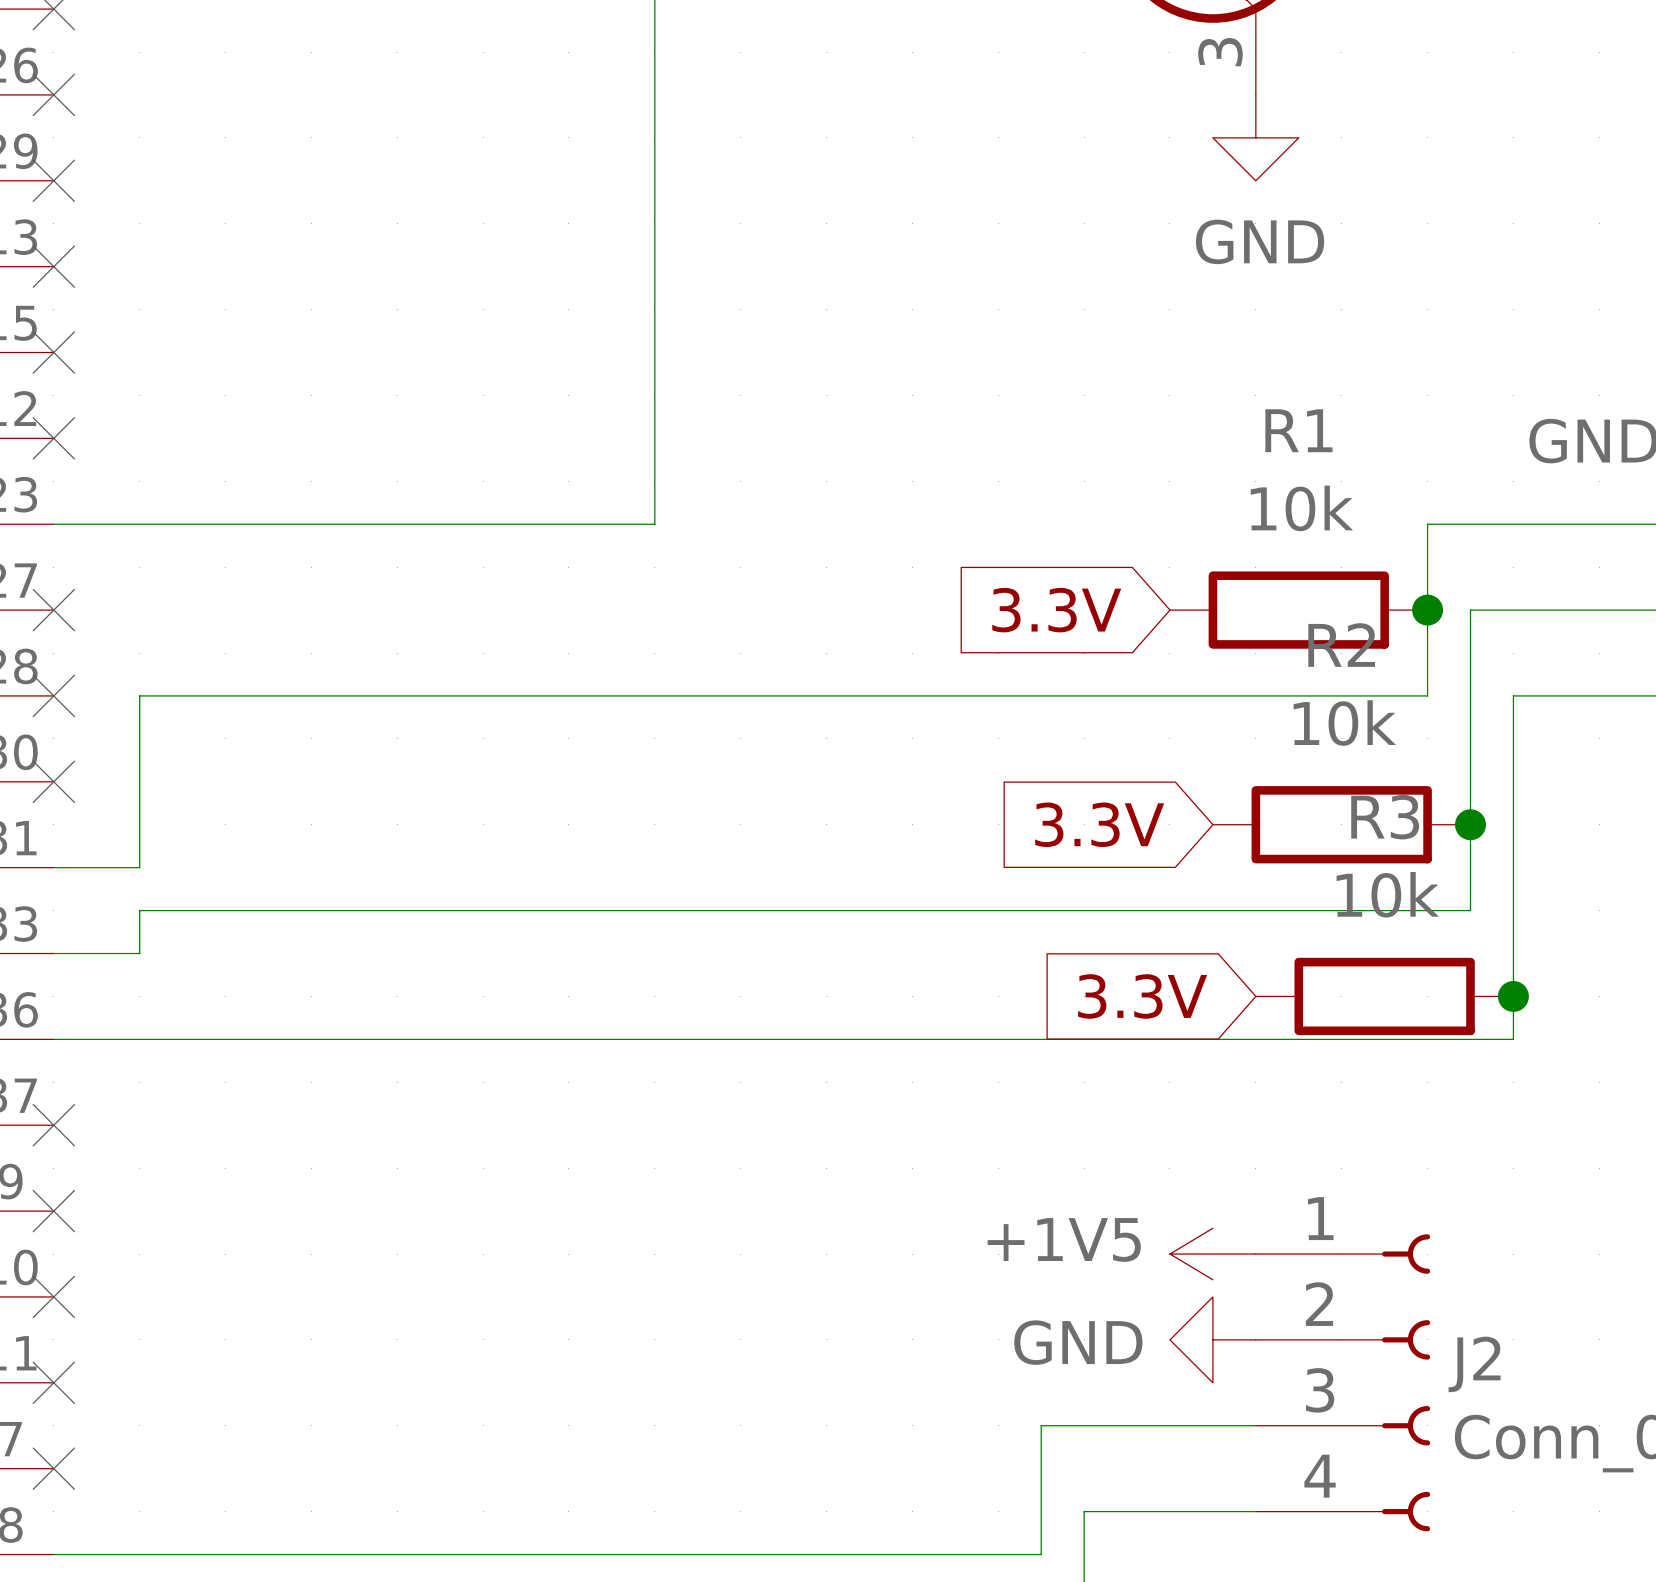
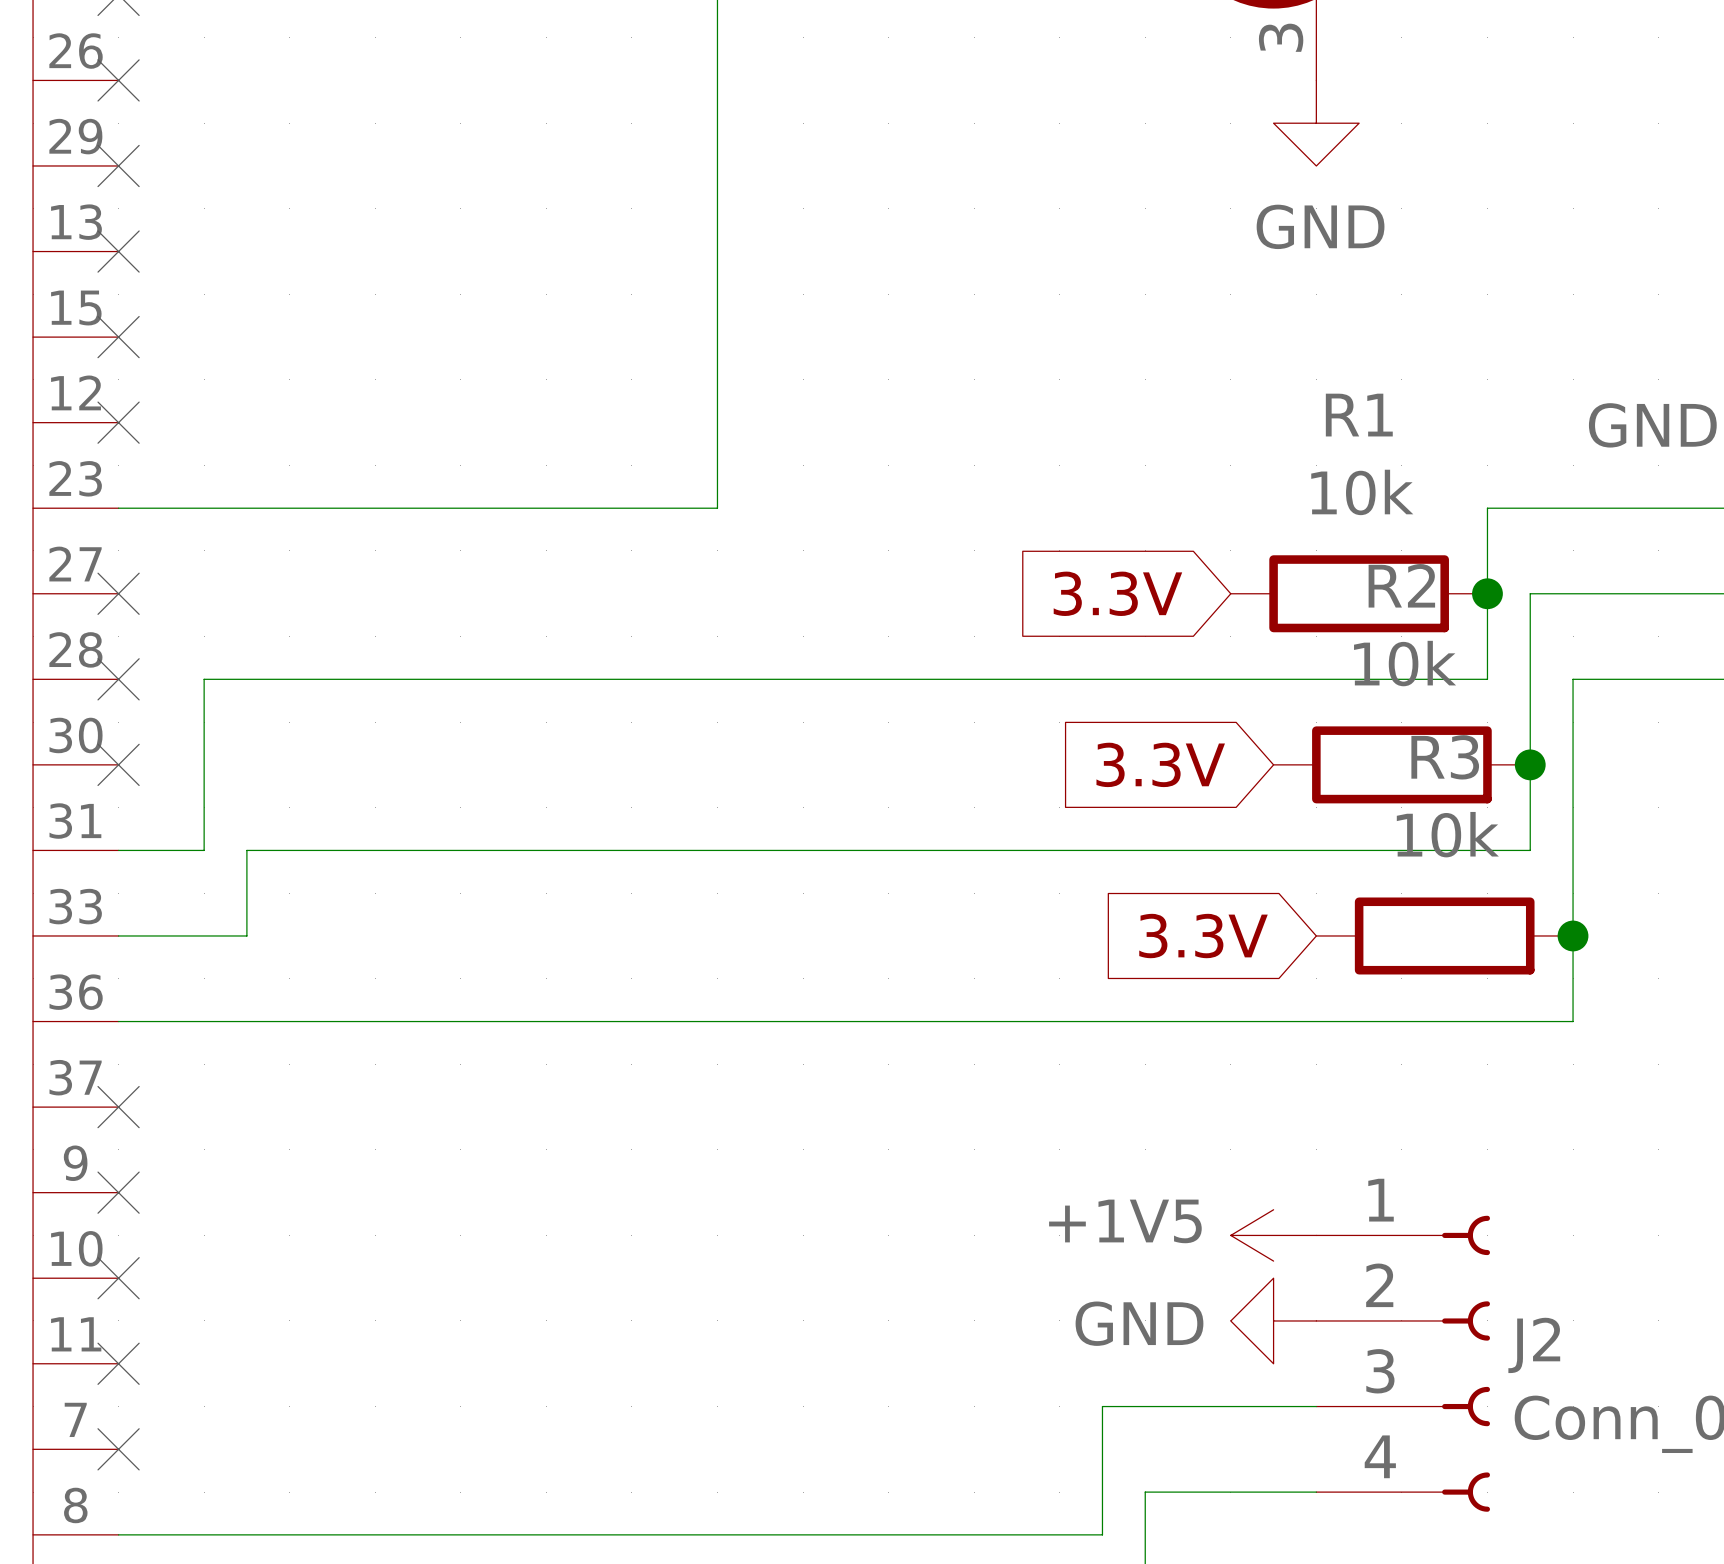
global label position: 3.3V (1099, 824) -> 3.3V (1160, 764)
R2 position: (1341, 824) -> (1401, 764)
junction position: (1470, 824) -> (1530, 764)
wire: (1470, 867) (1470, 910) (139, 910) (139, 953) -> (1530, 850) (246, 850) (246, 935) (204, 935)
global label position: 3.3V (1142, 996) -> 3.3V (1203, 936)
R3 position: (1384, 996) -> (1444, 935)
junction position: (1513, 996) -> (1573, 935)

